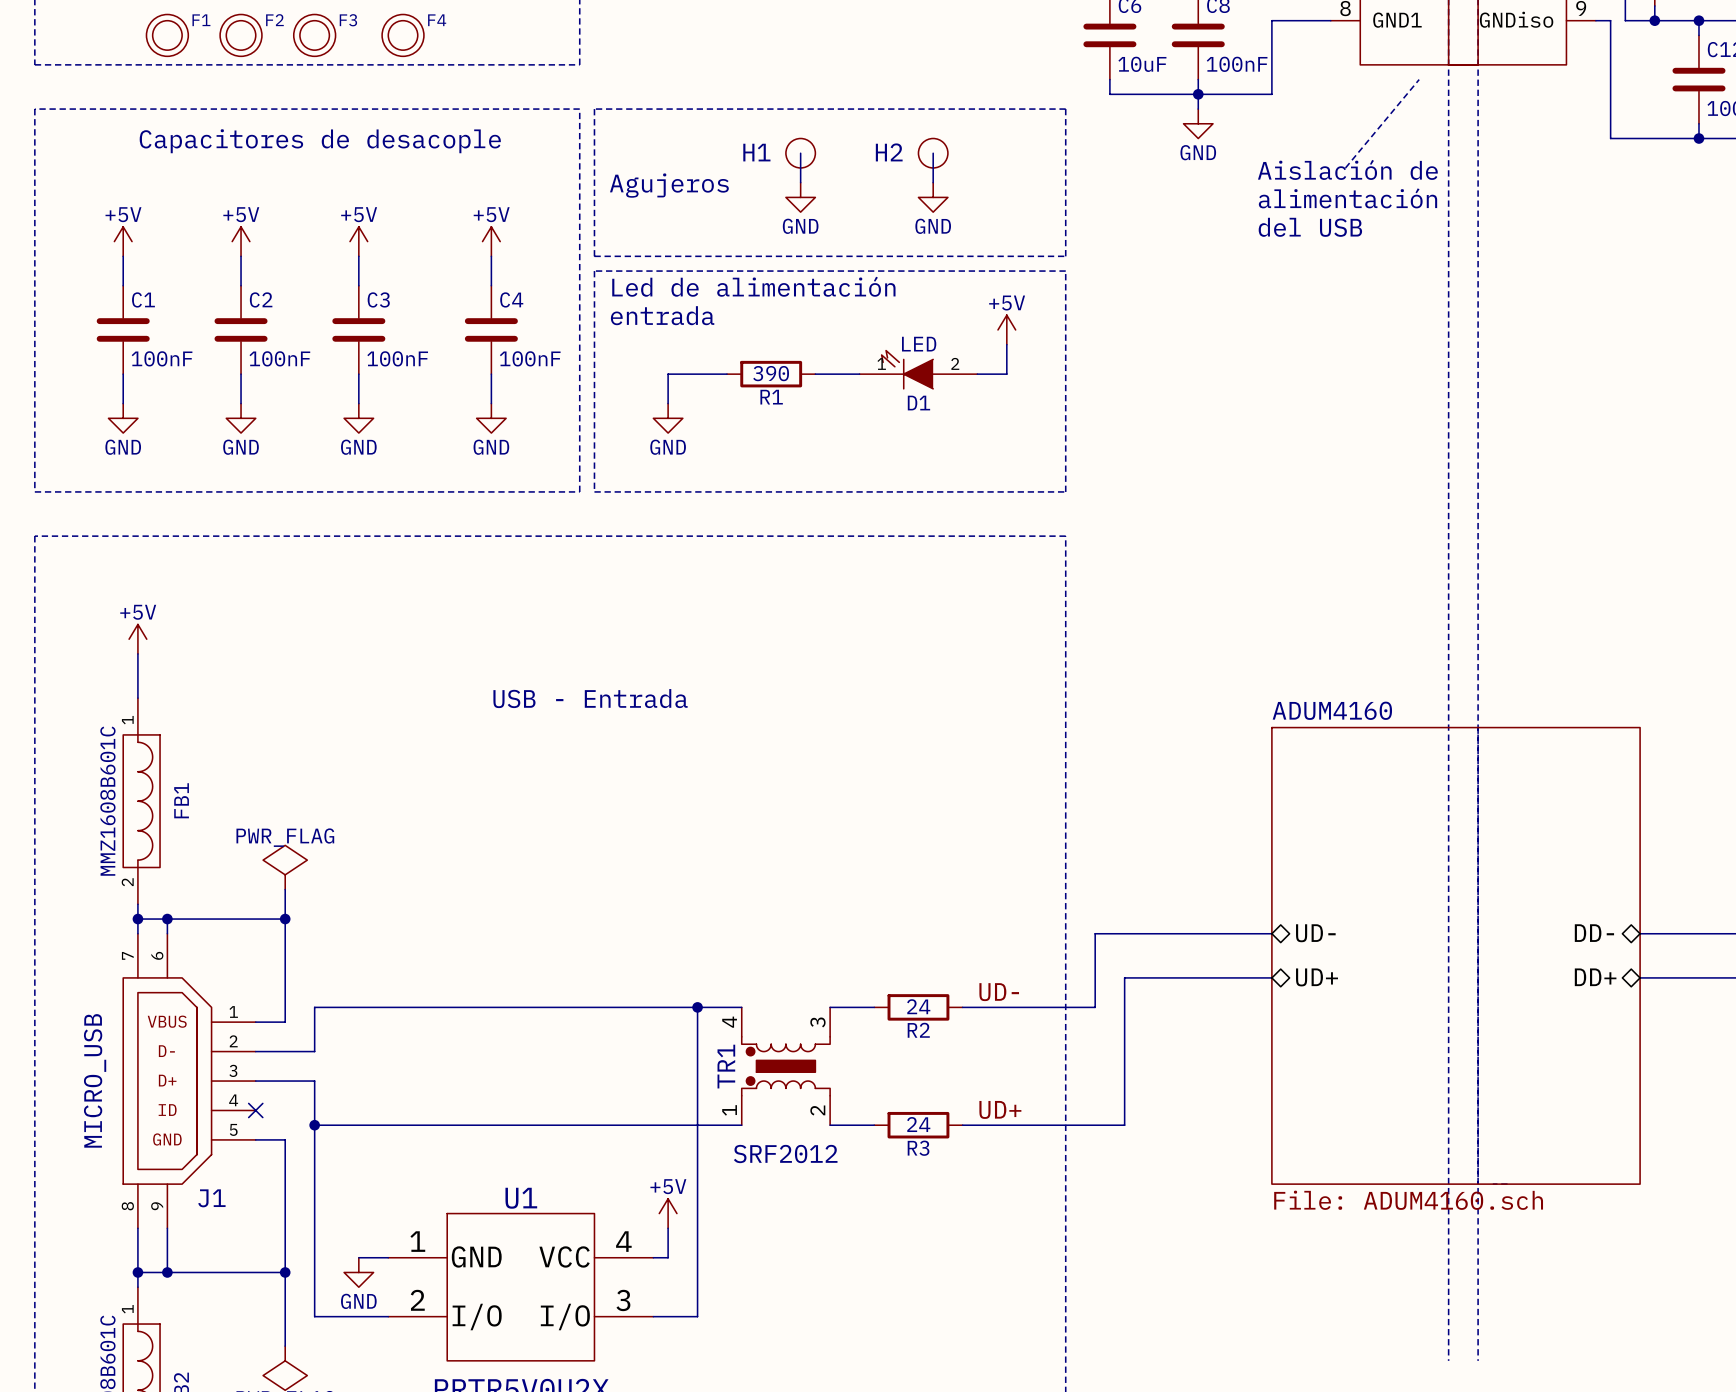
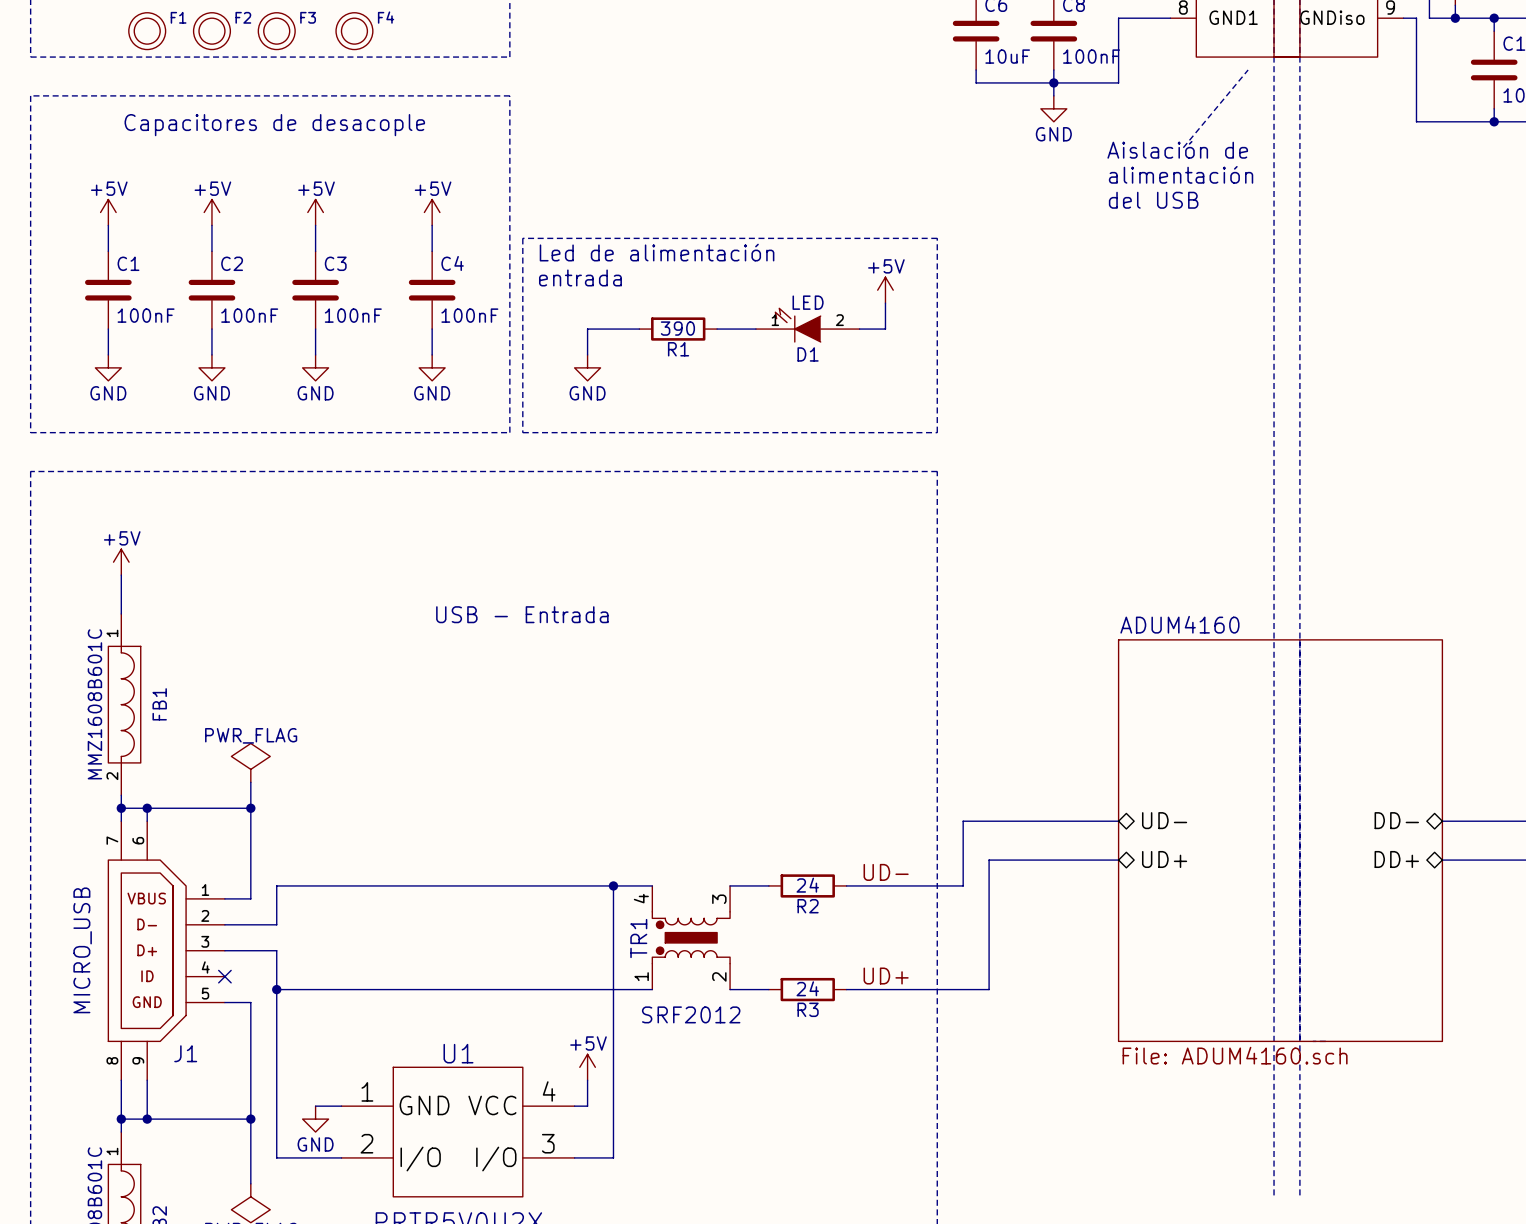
line: (594, 109) (1065, 109) (1065, 256) (594, 256) (594, 109) -> none
wire: (800, 153) (800, 182) -> none
H1: (800, 153) -> none
wire: (933, 153) (933, 182) -> none
H2: (933, 153) -> none
text: Agujeros (669, 185) -> none
power symbol: GND (800, 197) -> none
power symbol: GND (933, 197) -> none

